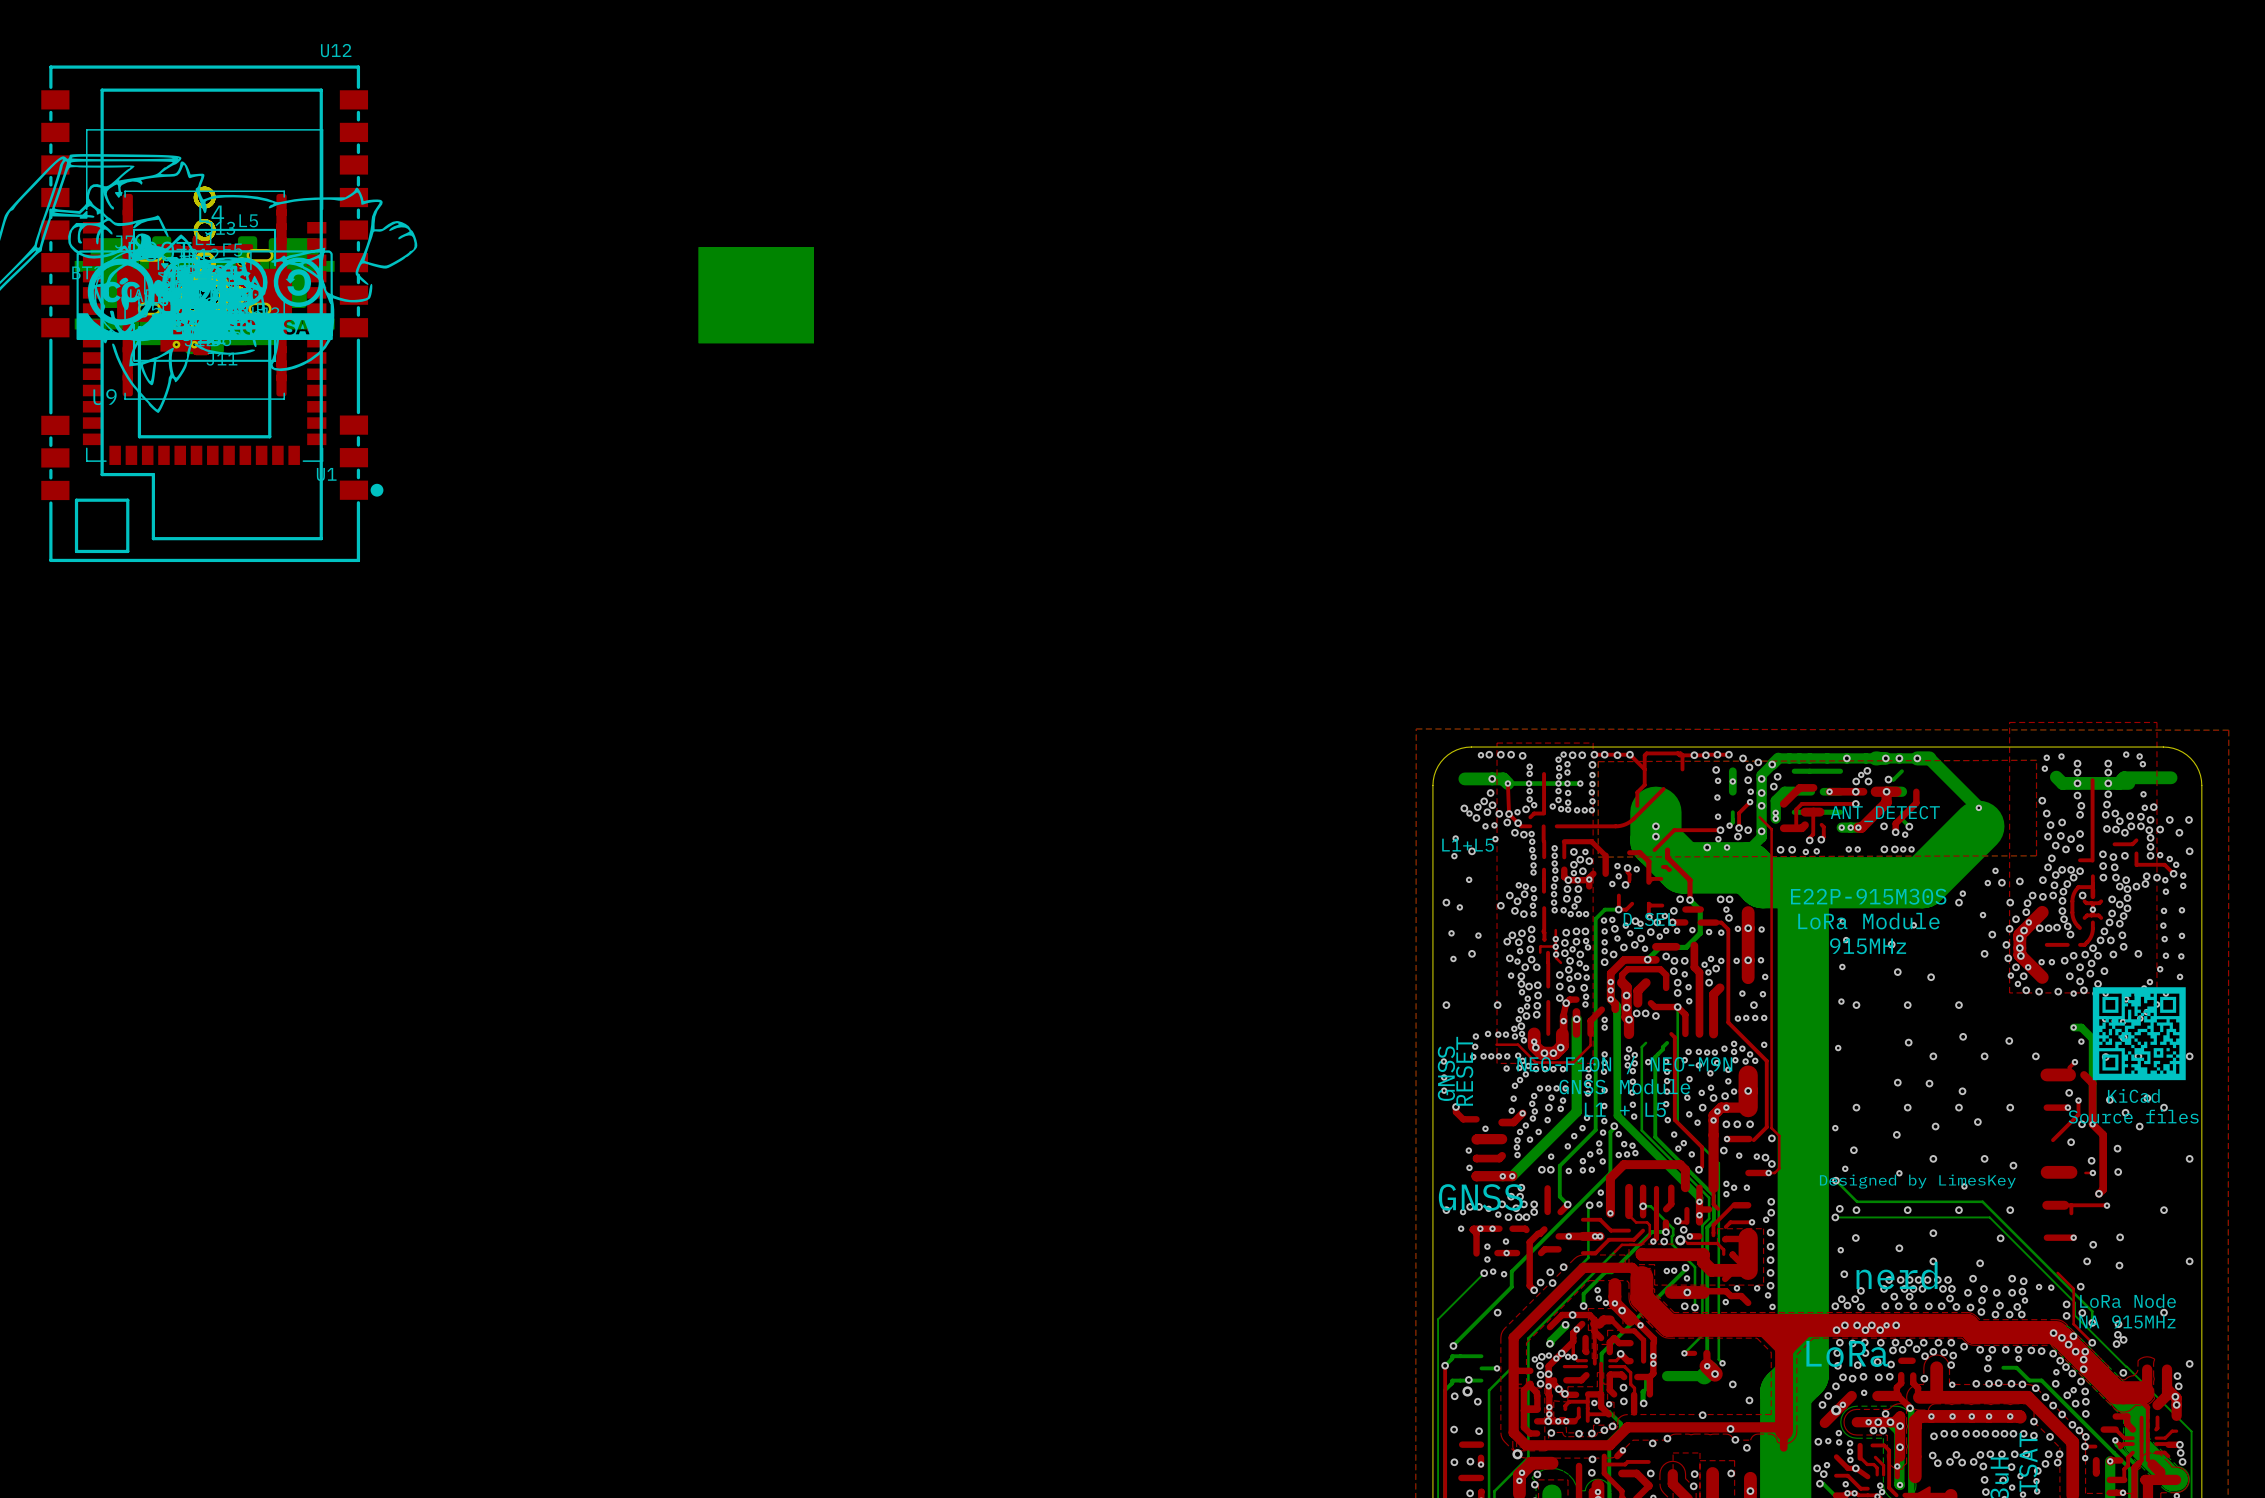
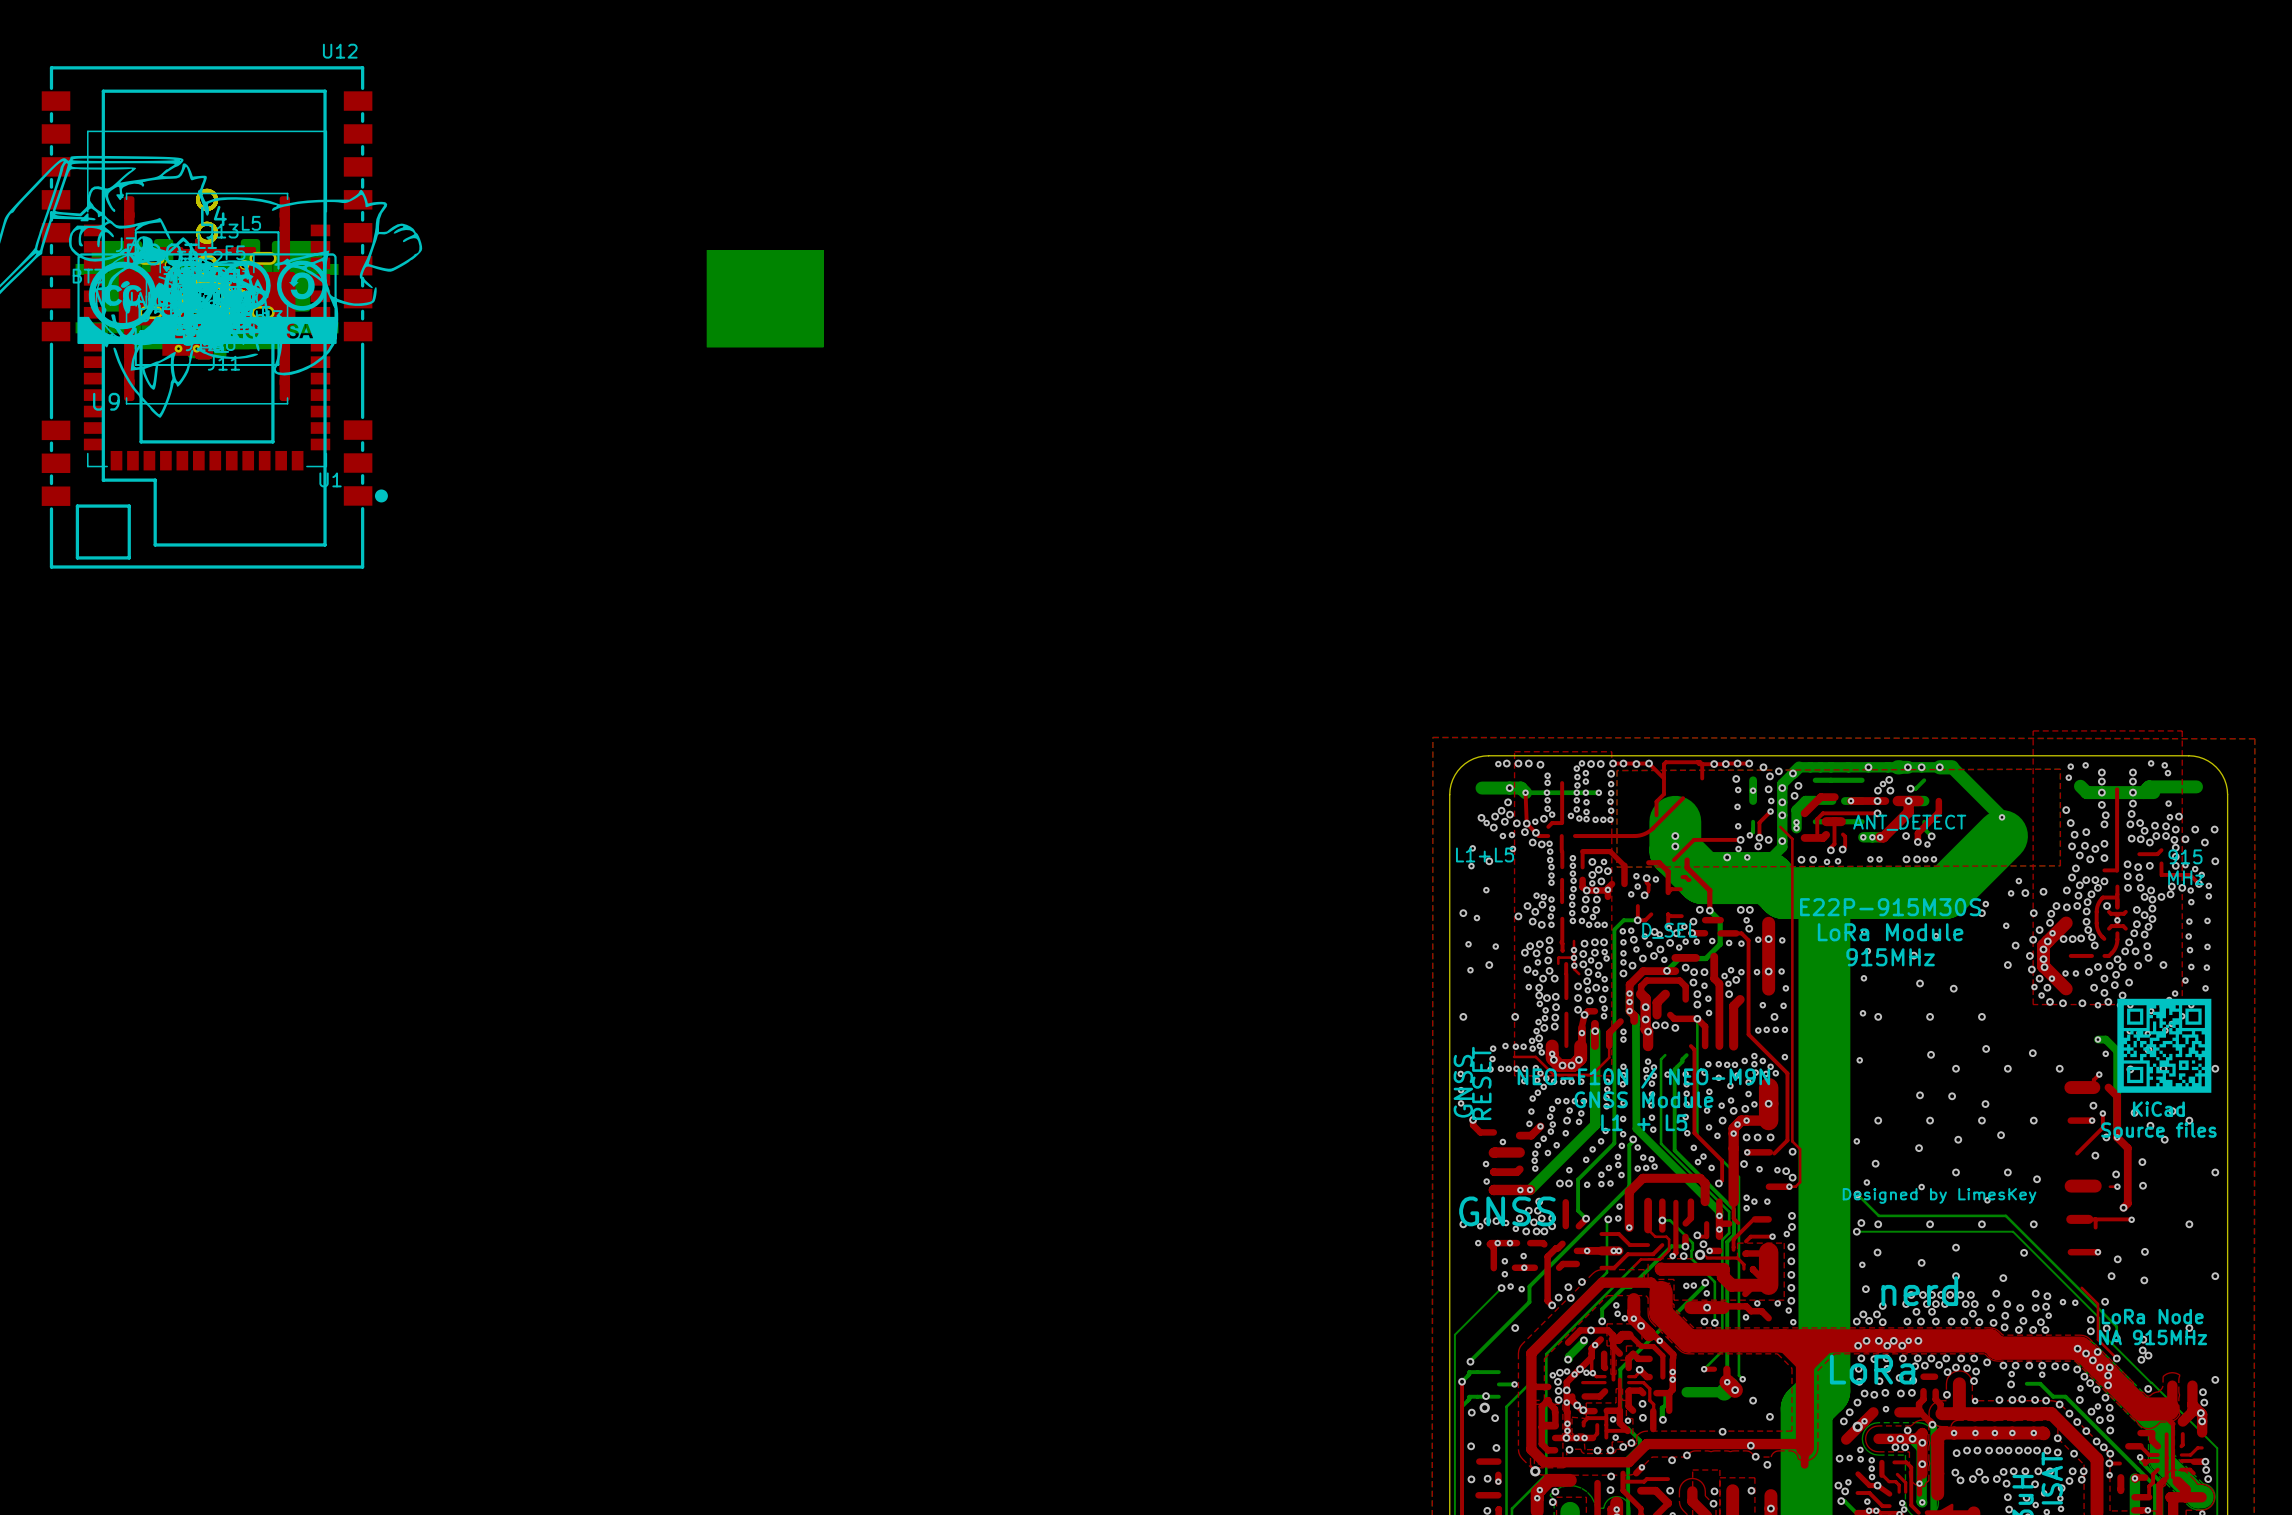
text: none -> 915 (2185, 856)
text: none -> MHz (2186, 877)

